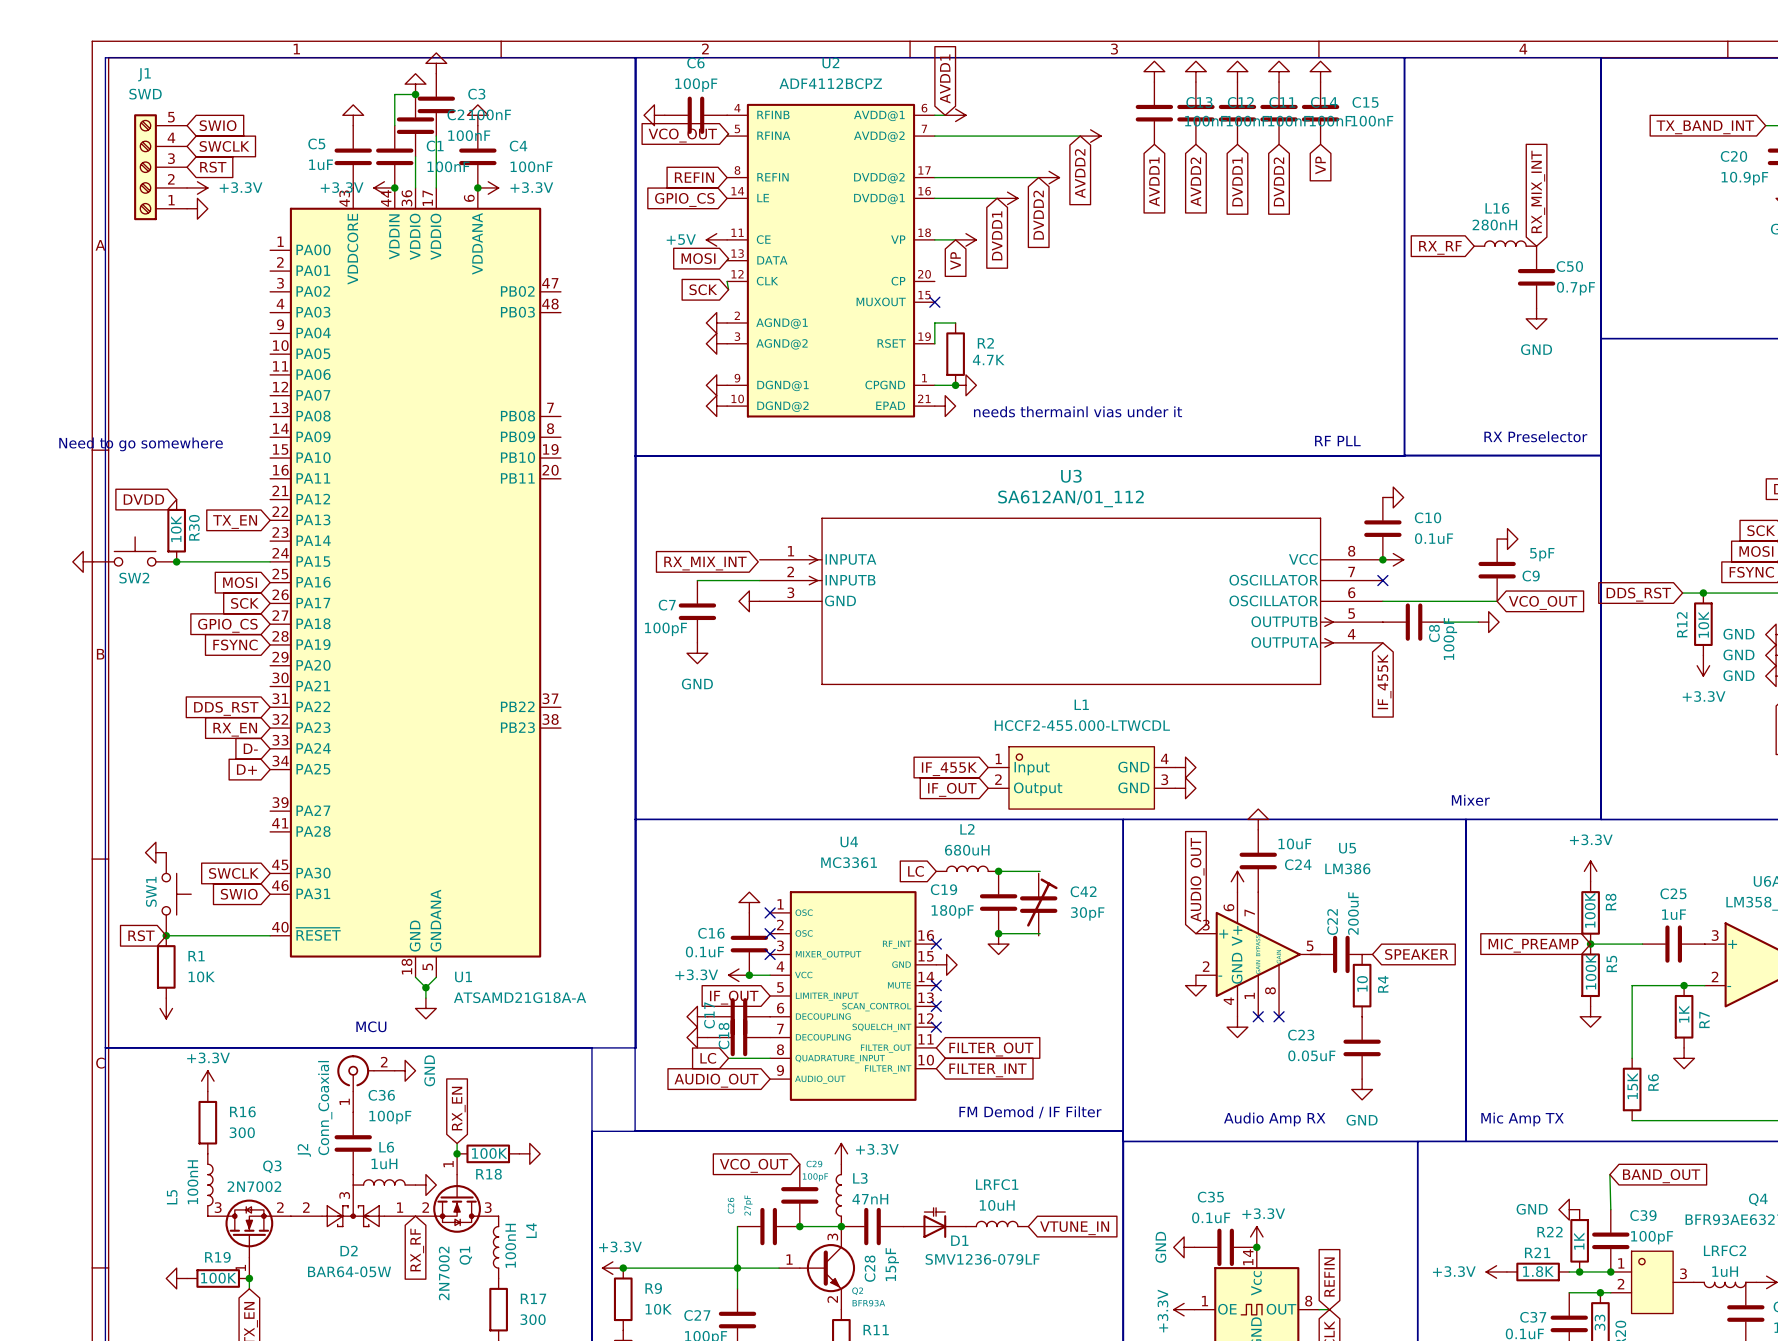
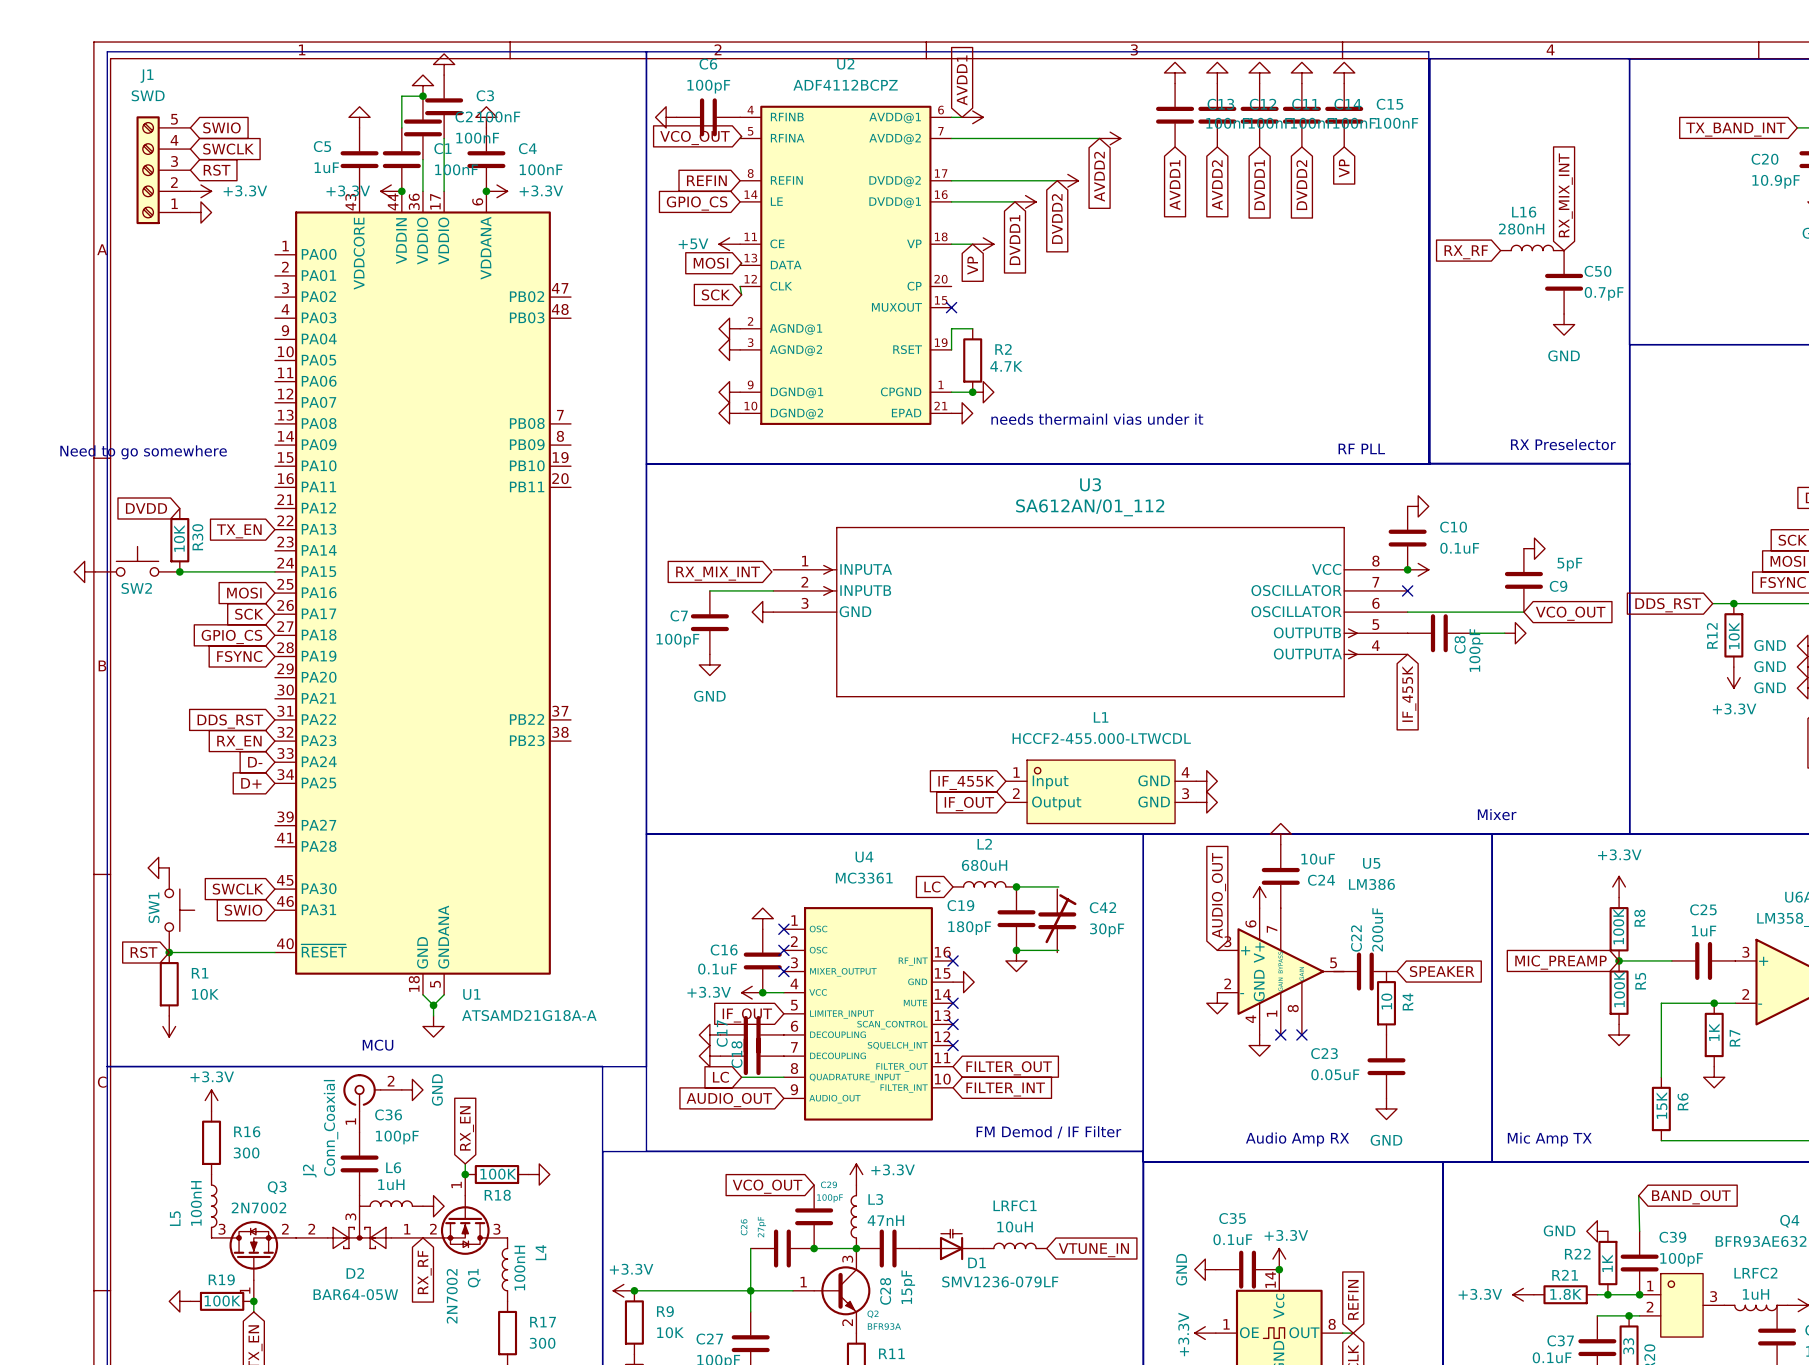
line: (105, 57) (636, 57) (635, 1047) -> (107, 58) (107, 51) (1428, 51) (1428, 464)
line: (635, 57) (1404, 57) -> (646, 58) (646, 51)

